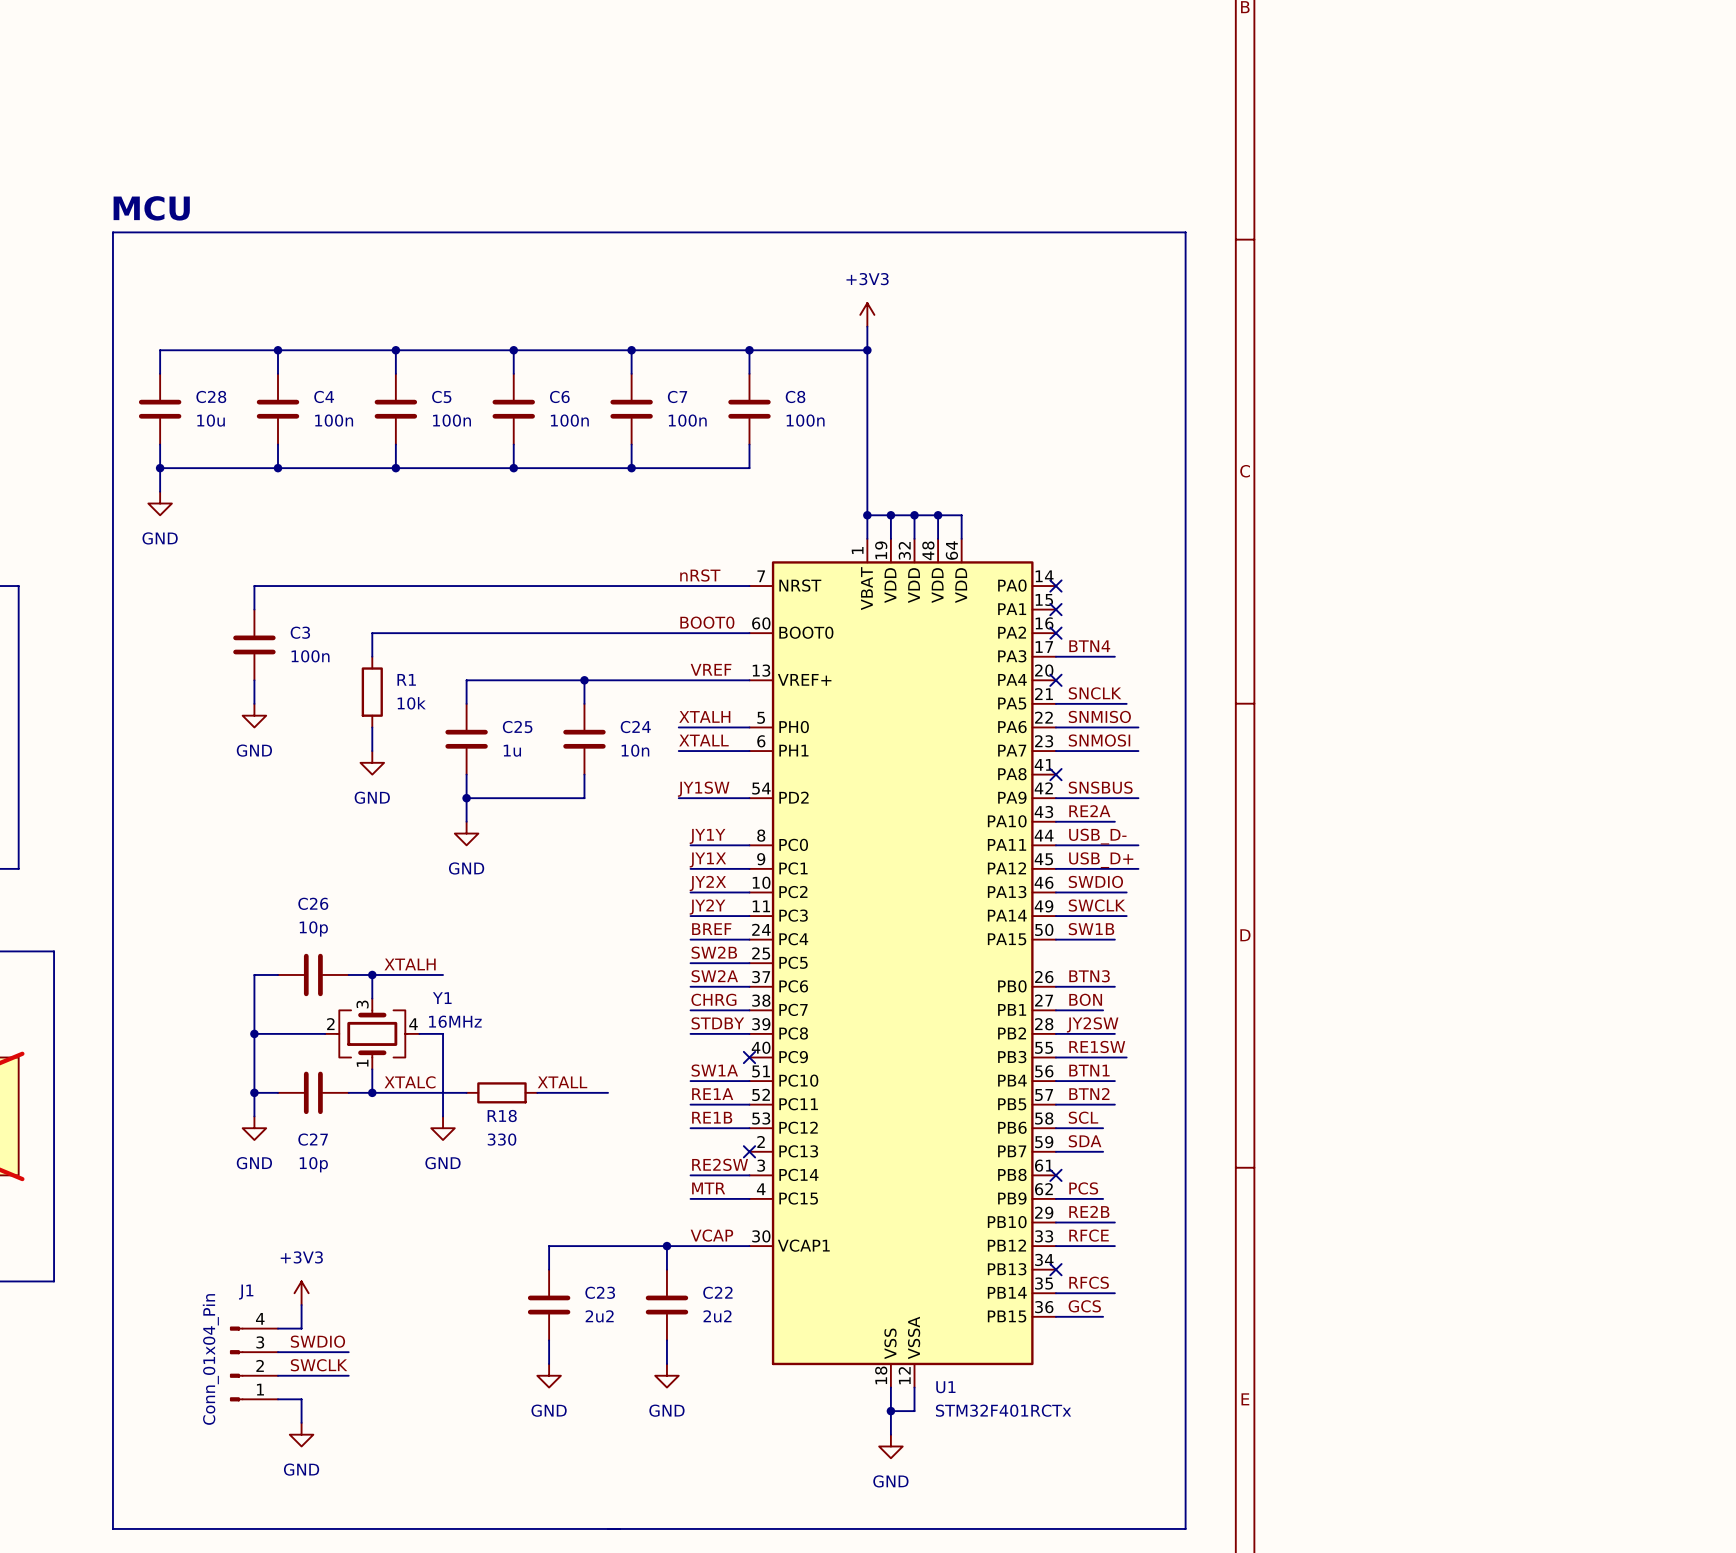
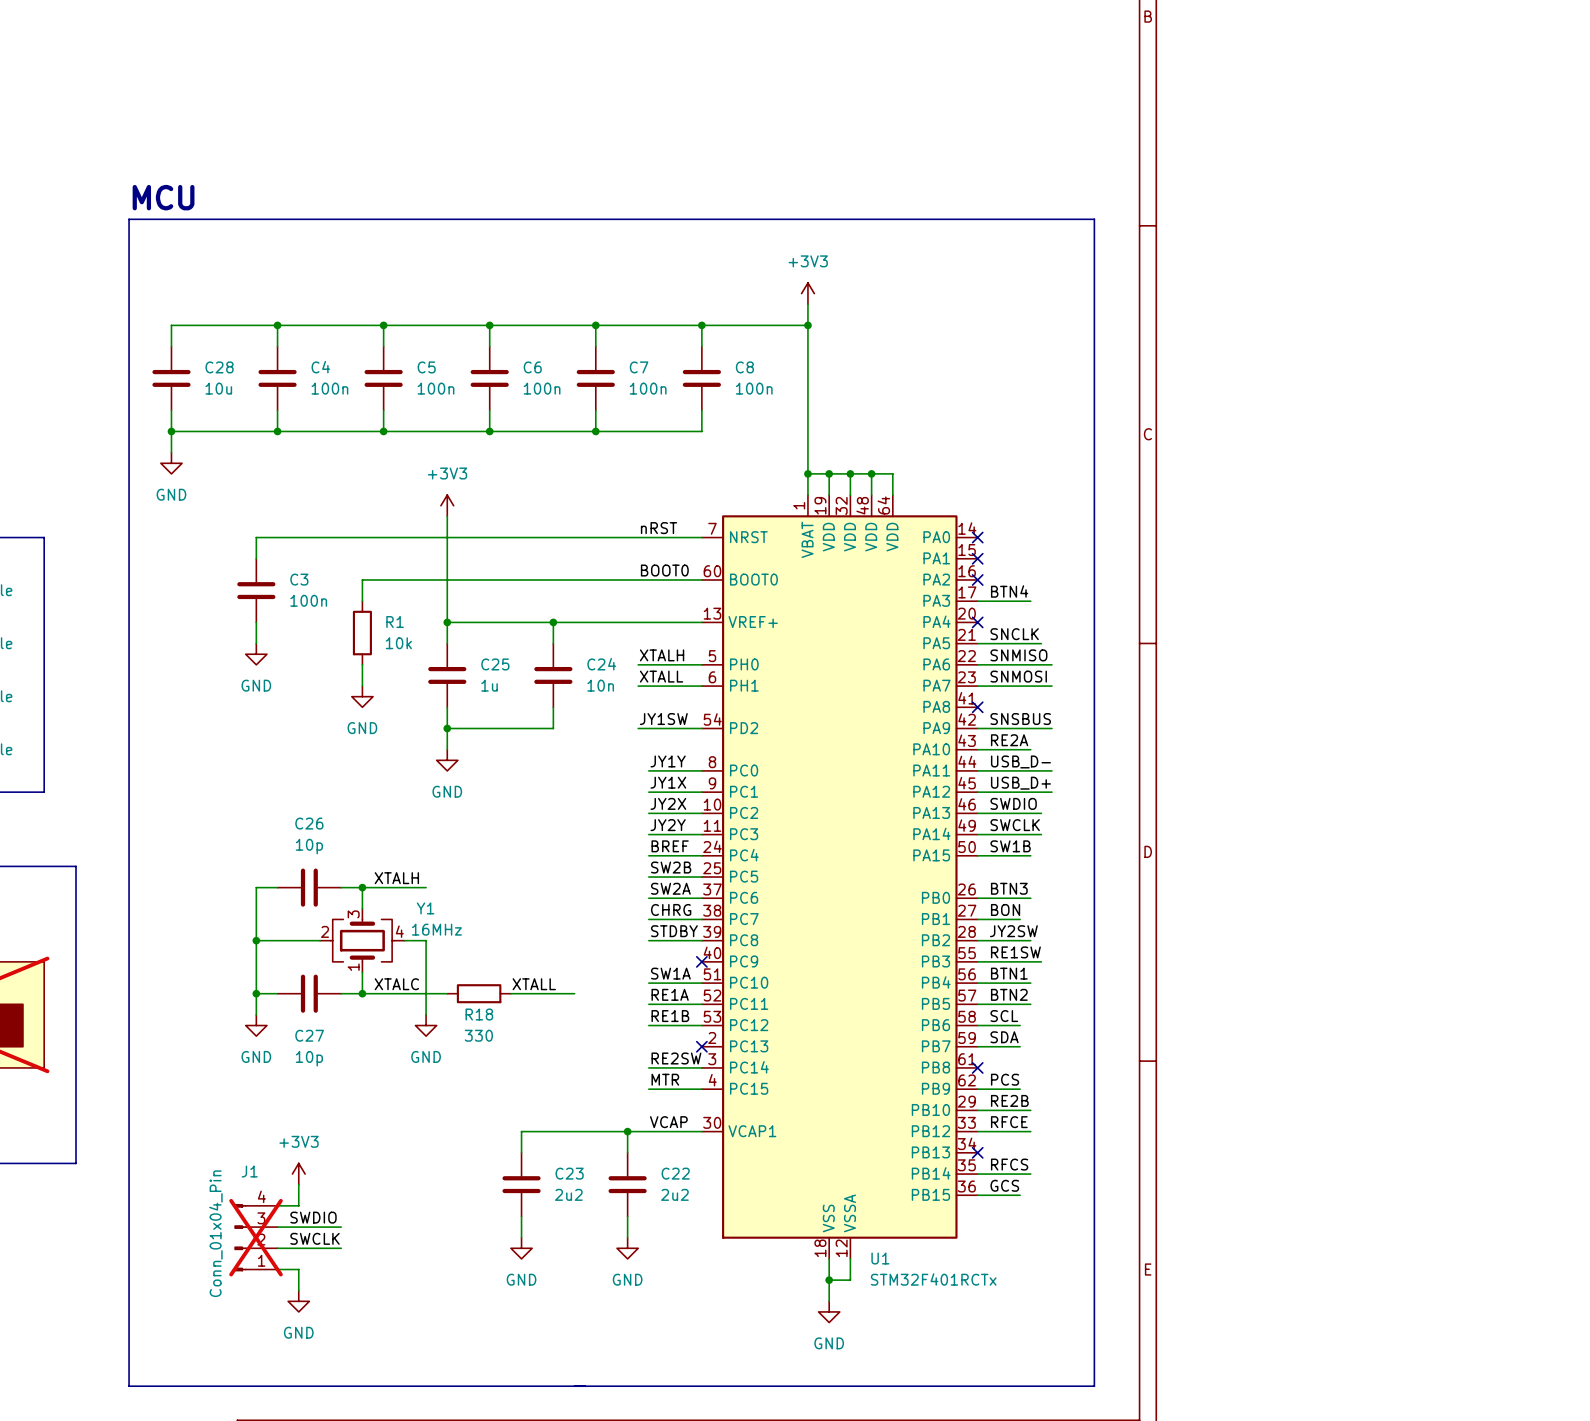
power symbol: none -> +3V3 (447, 505)
wire: none -> (447, 516) (447, 622)
label: VREF (711, 669) -> none
junction: none -> (447, 622)
J1 do-not-place cross: none -> (256, 1237)

